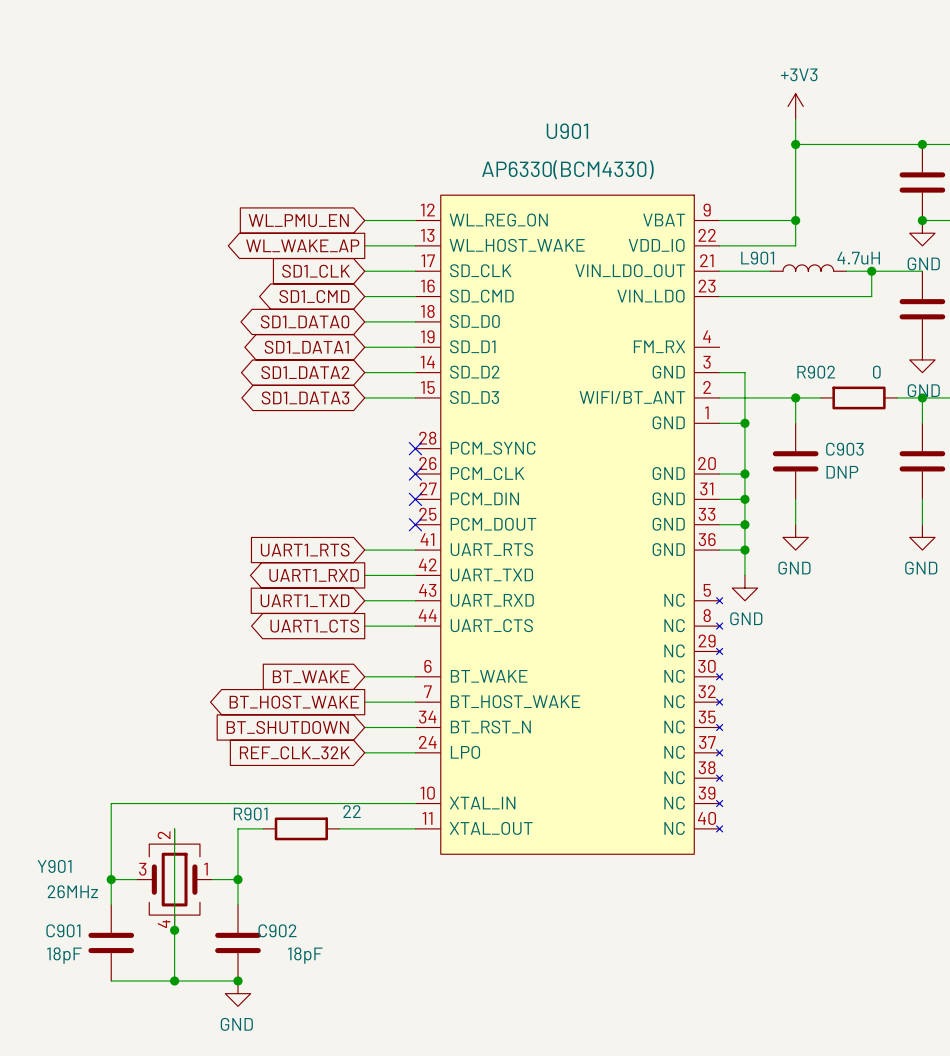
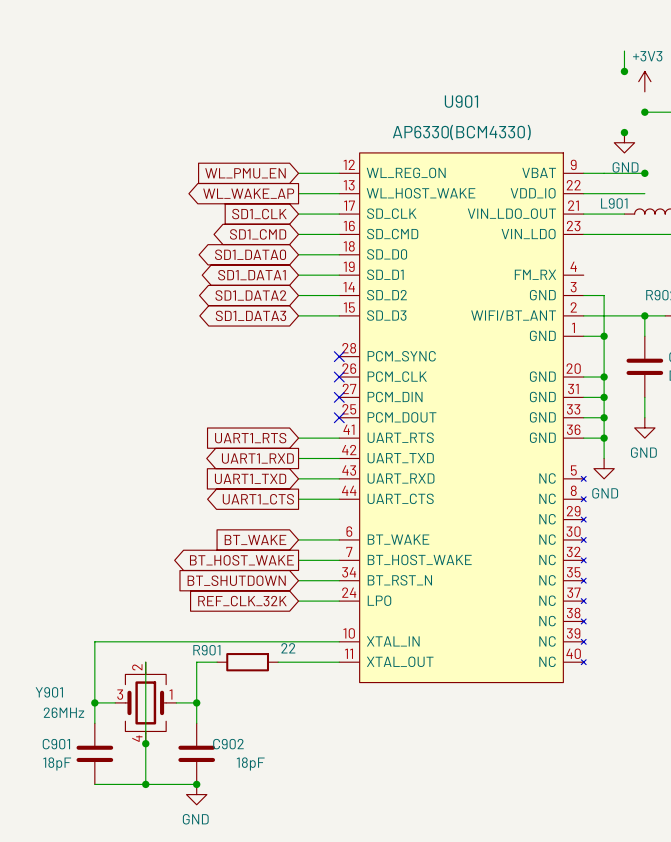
wire: none -> (624, 51) (624, 71)
junction: none -> (624, 71)
wire: (795, 119) (795, 245) -> none
junction: none -> (624, 132)
power symbol: none -> GND (624, 142)

